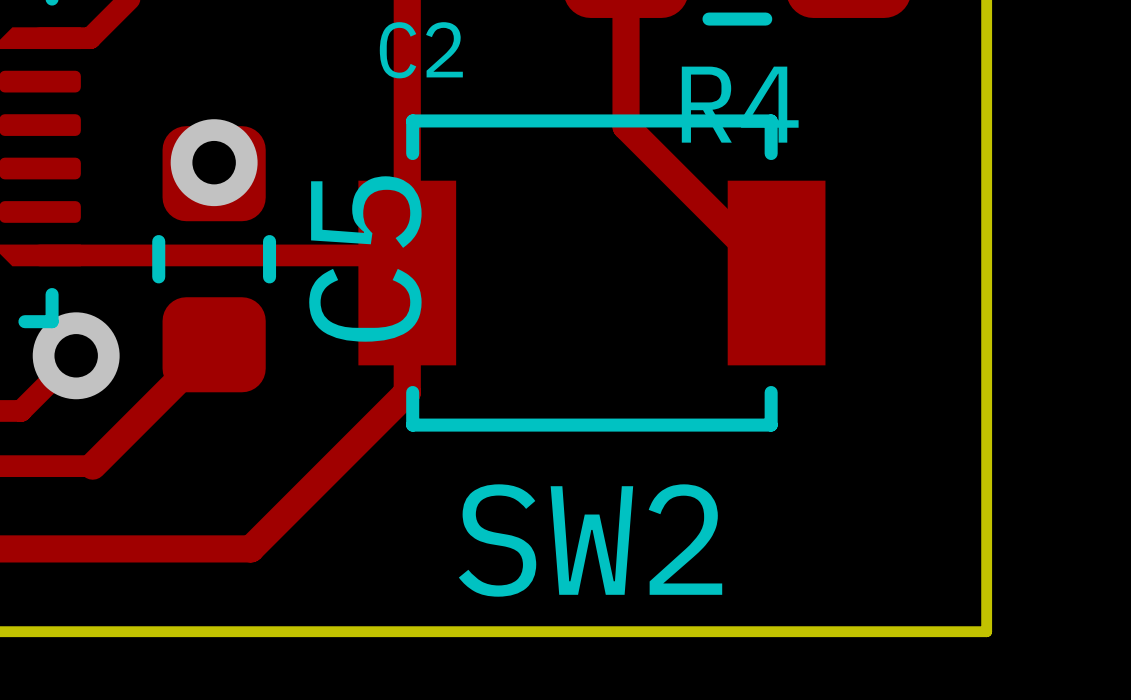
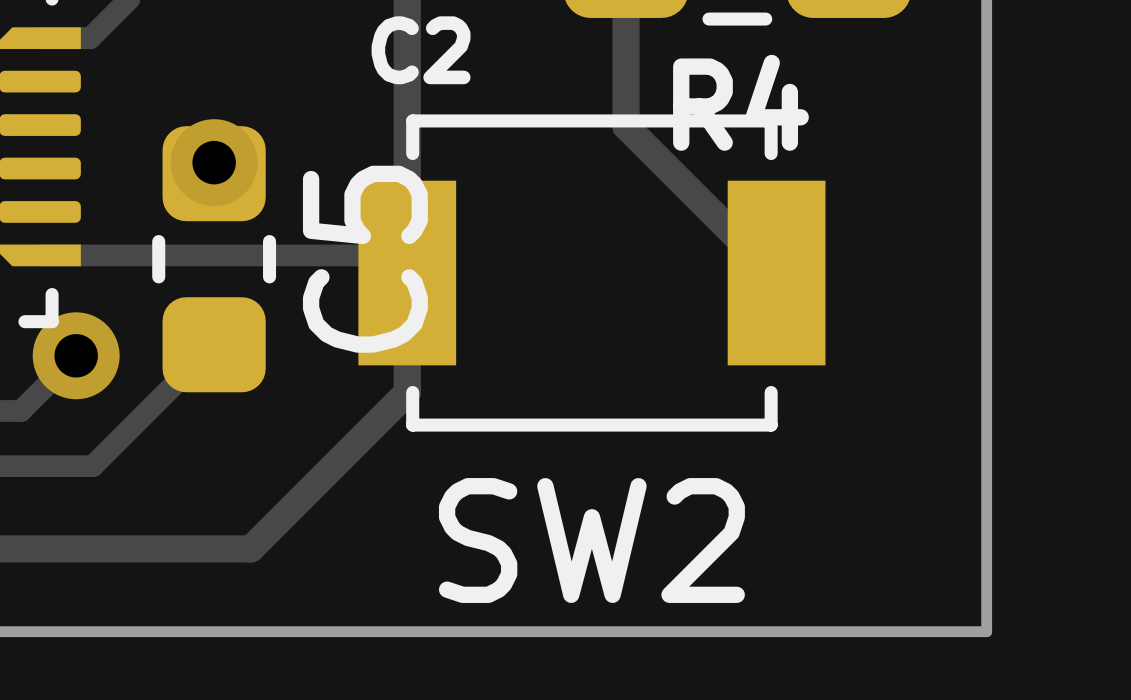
track width: thick (214, 344) (92, 466) -> thin (214, 344) (92, 466)

